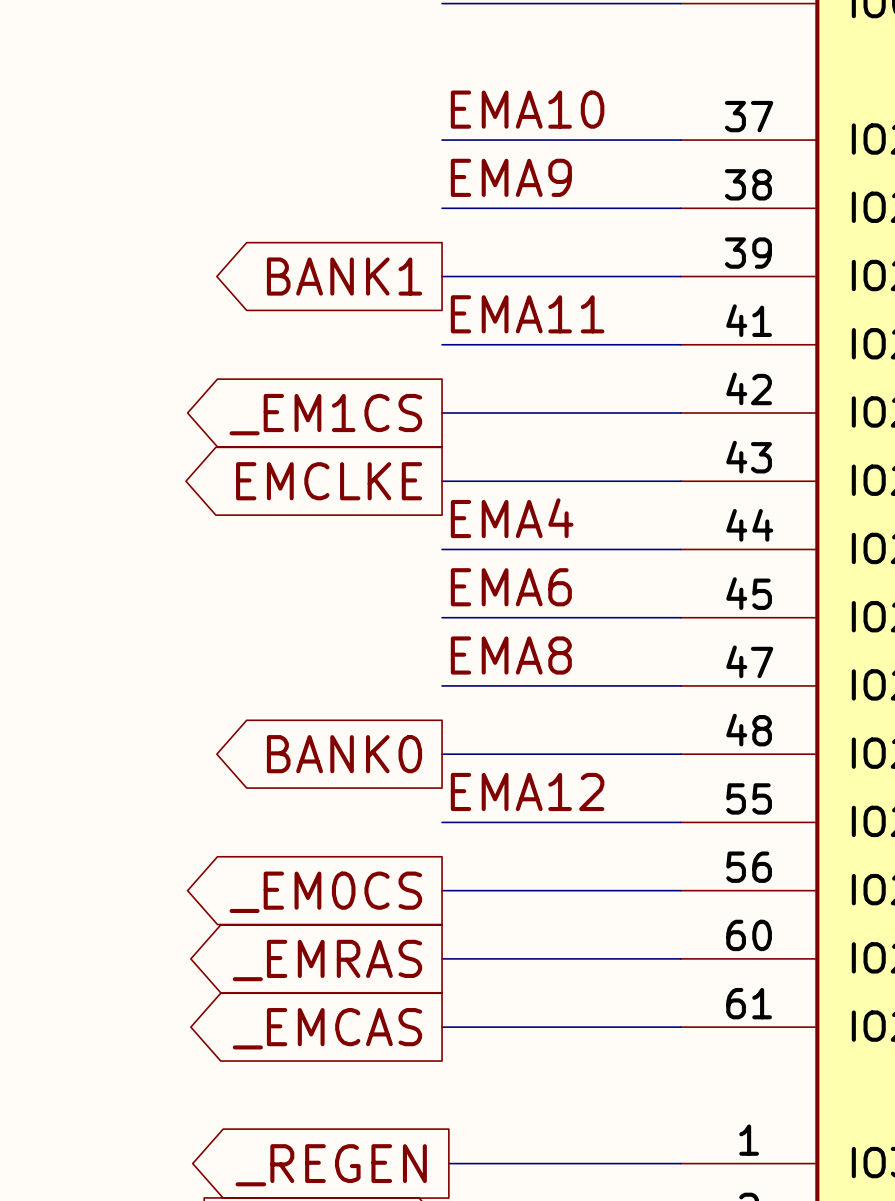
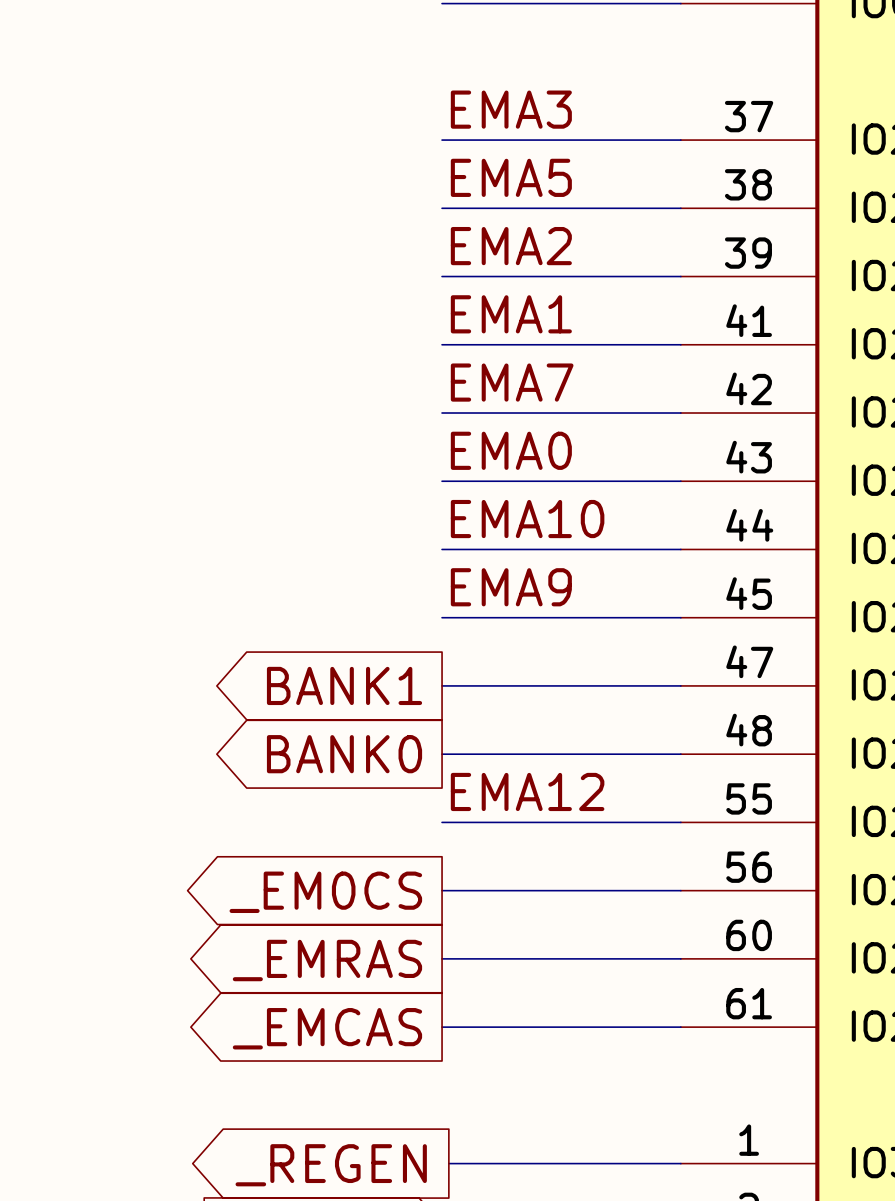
label: EMA10 (527, 109) -> EMA3 (511, 109)
label: EMA9 (511, 177) -> EMA5 (511, 177)
label: none -> EMA2 (511, 246)
global label position: BANK1 (344, 276) -> BANK1 (344, 685)
label: EMA11 (527, 314) -> EMA1 (511, 314)
label: none -> EMA7 (512, 382)
global label: _EM1CS (325, 414) -> none
label: none -> EMA0 (511, 450)
global label: EMCLKE (329, 481) -> none
label: EMA4 (512, 518) -> EMA10 (527, 519)
label: EMA6 (511, 587) -> EMA9 (511, 587)
label: EMA8 (511, 655) -> none

